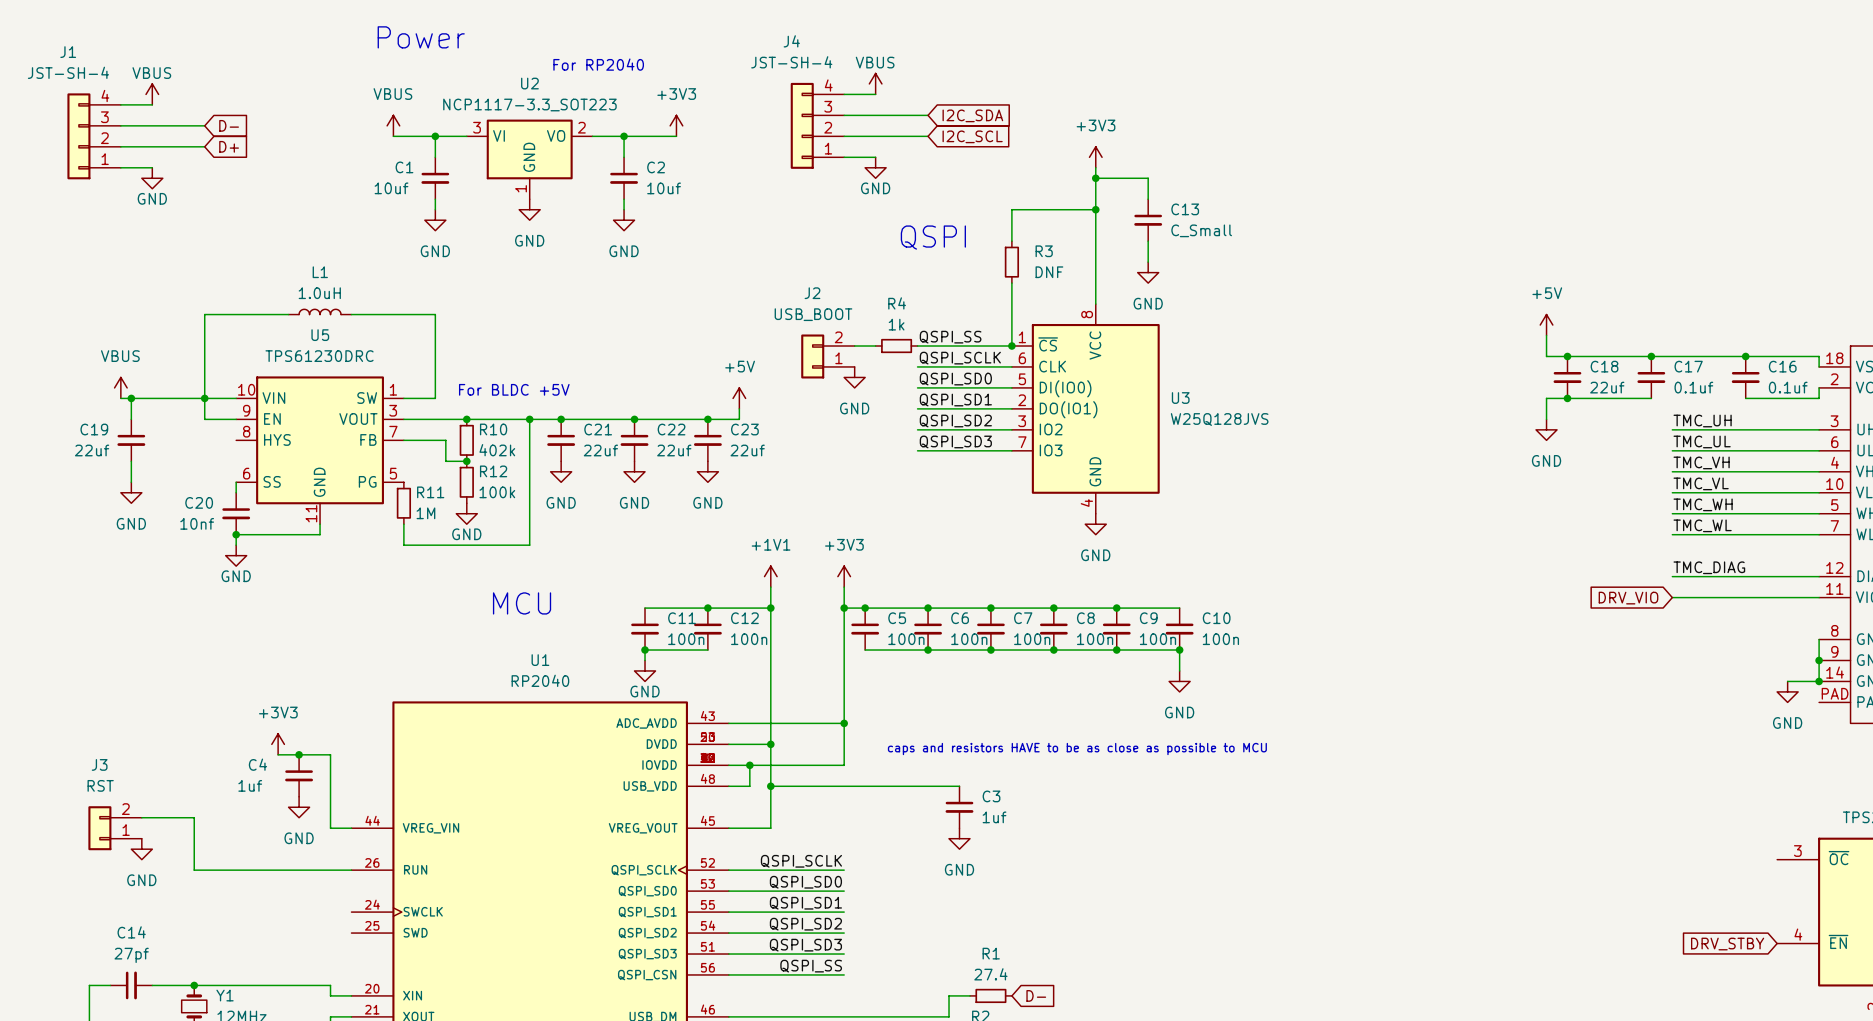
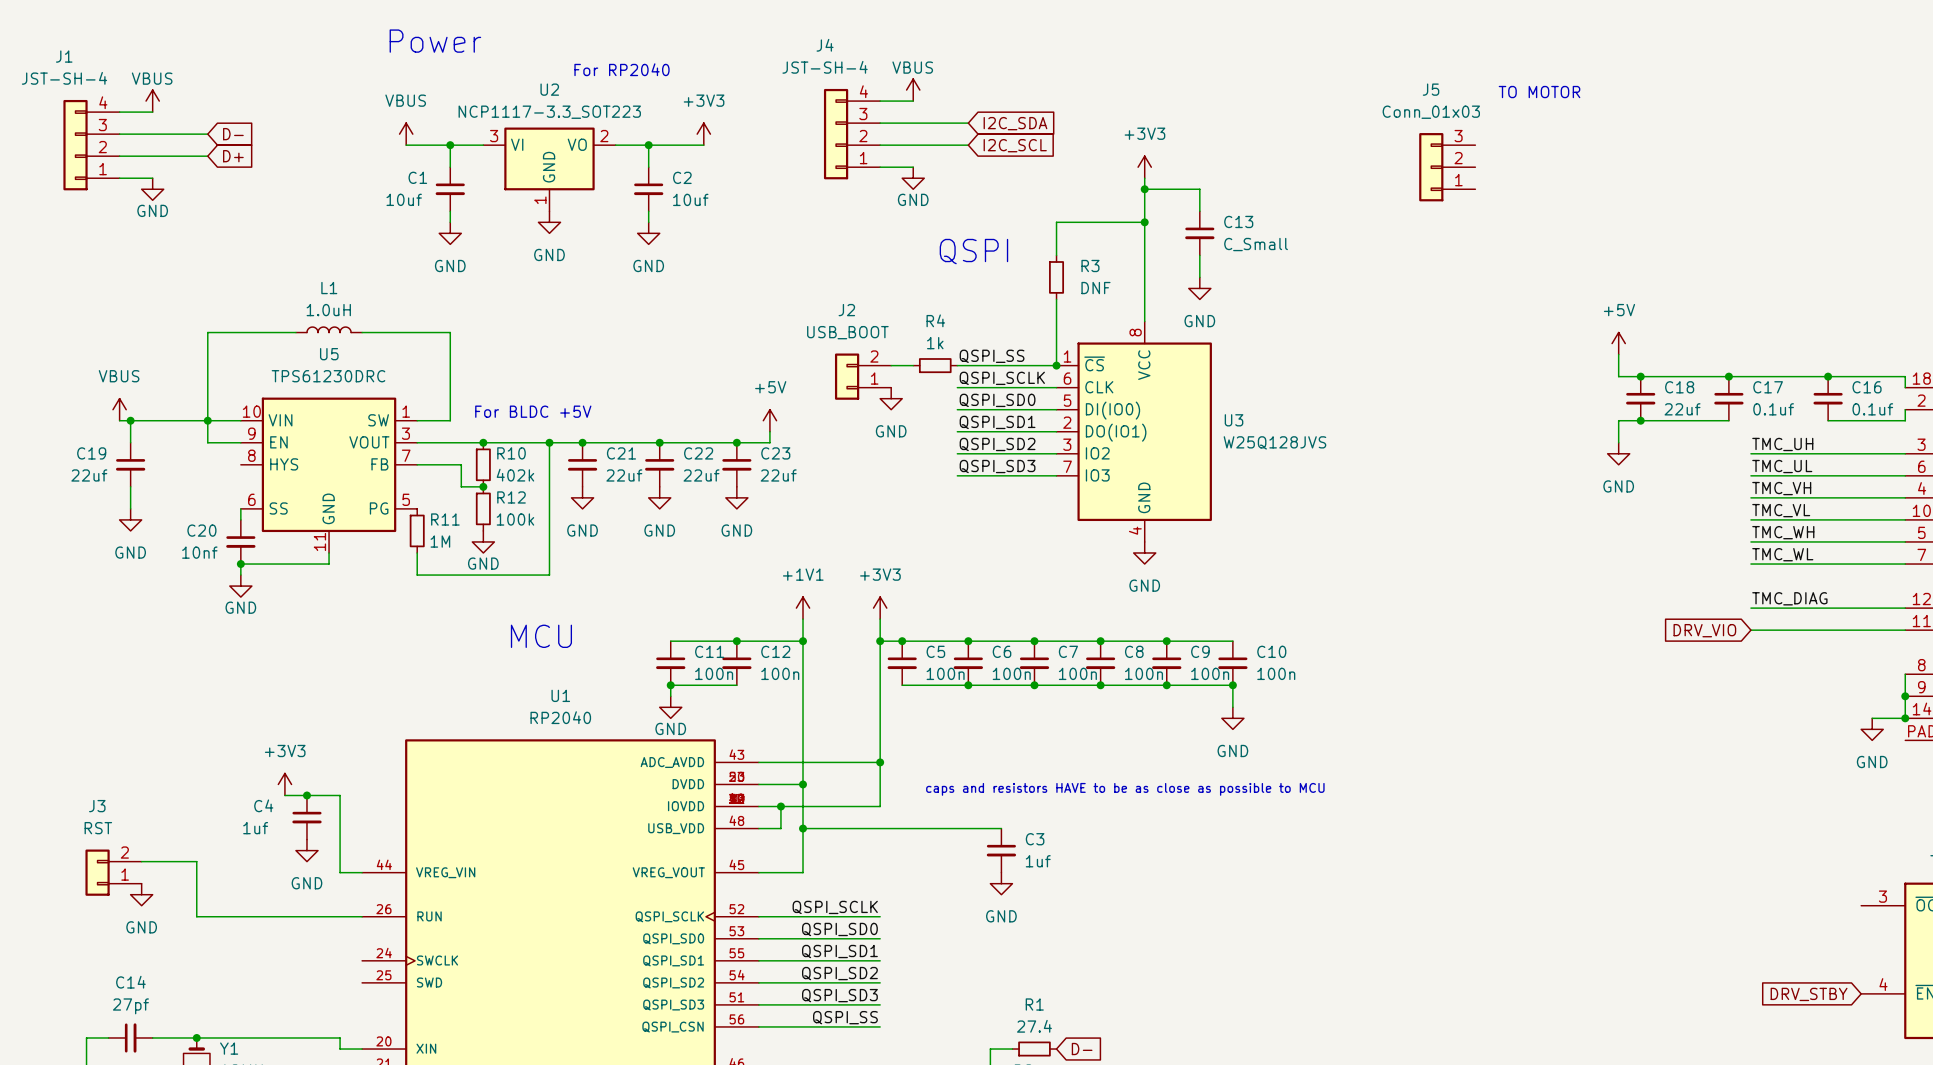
text: none -> TO MOTOR (1539, 92)
J5: none -> Conn_01x03 (1447, 167)

